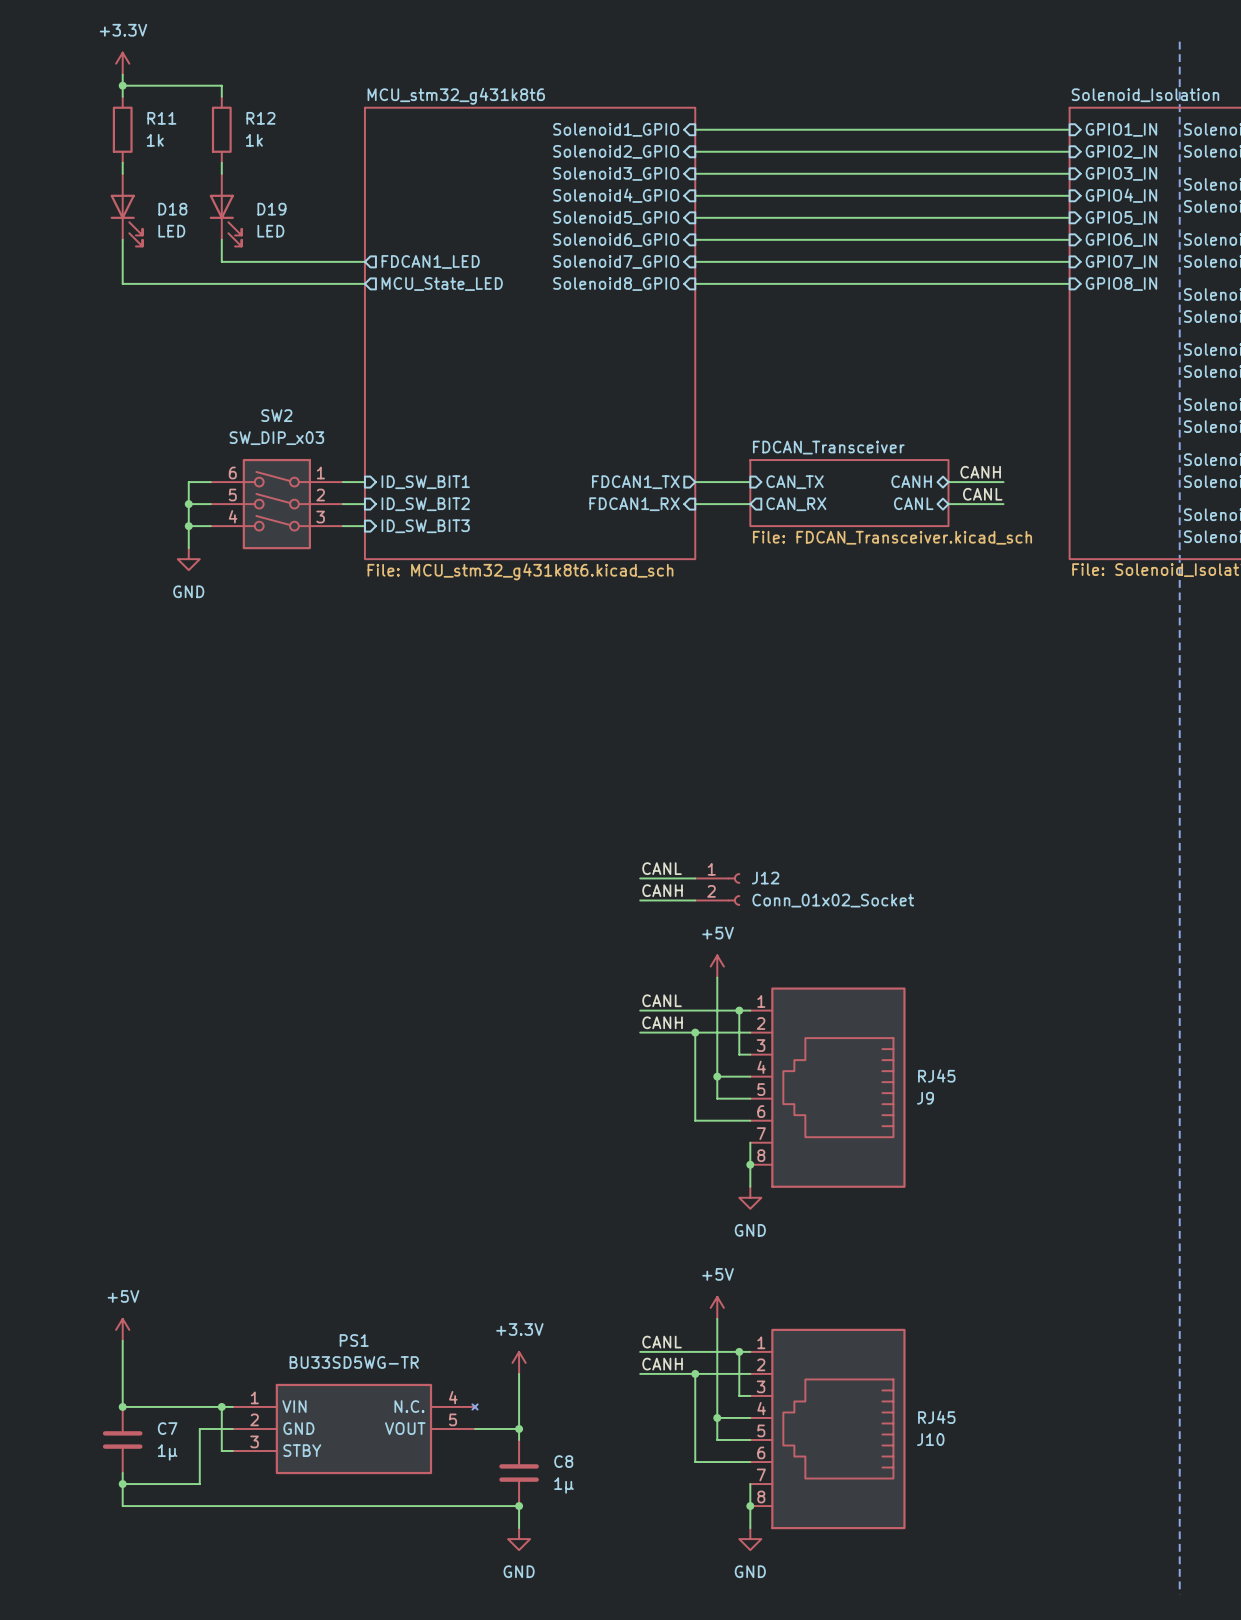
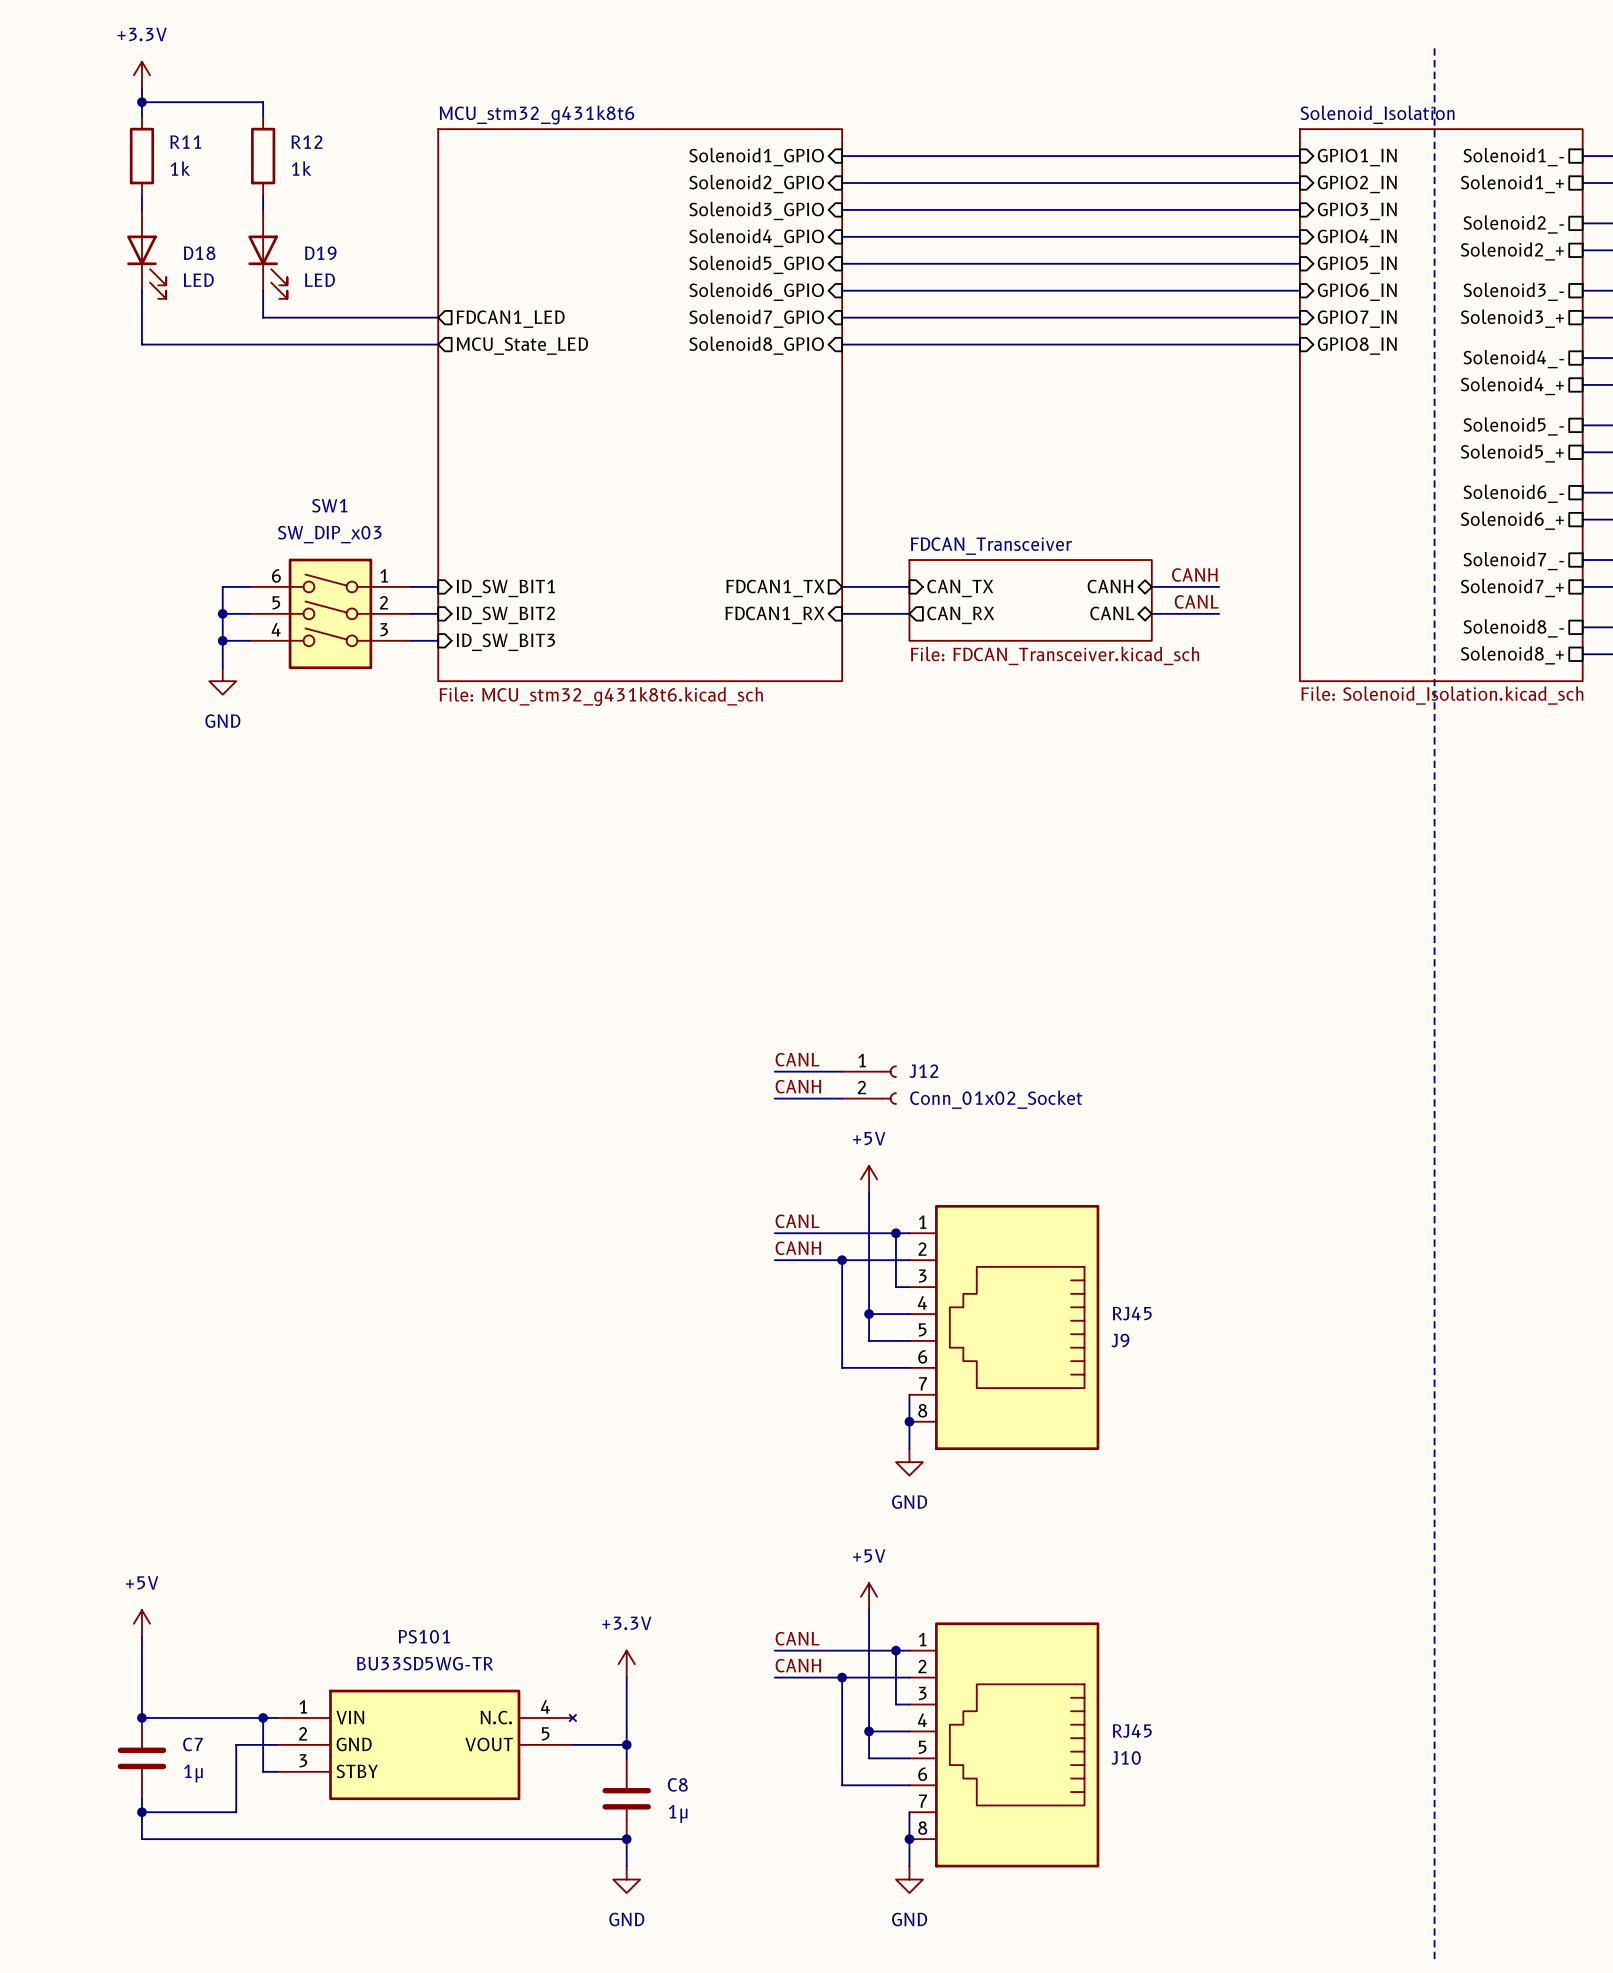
SW2 name: SW2 (276, 415) -> SW1 (329, 505)
PS1 name: PS1 (354, 1340) -> PS101 (424, 1636)
line: none -> (1434, 1946) (1434, 1960)

